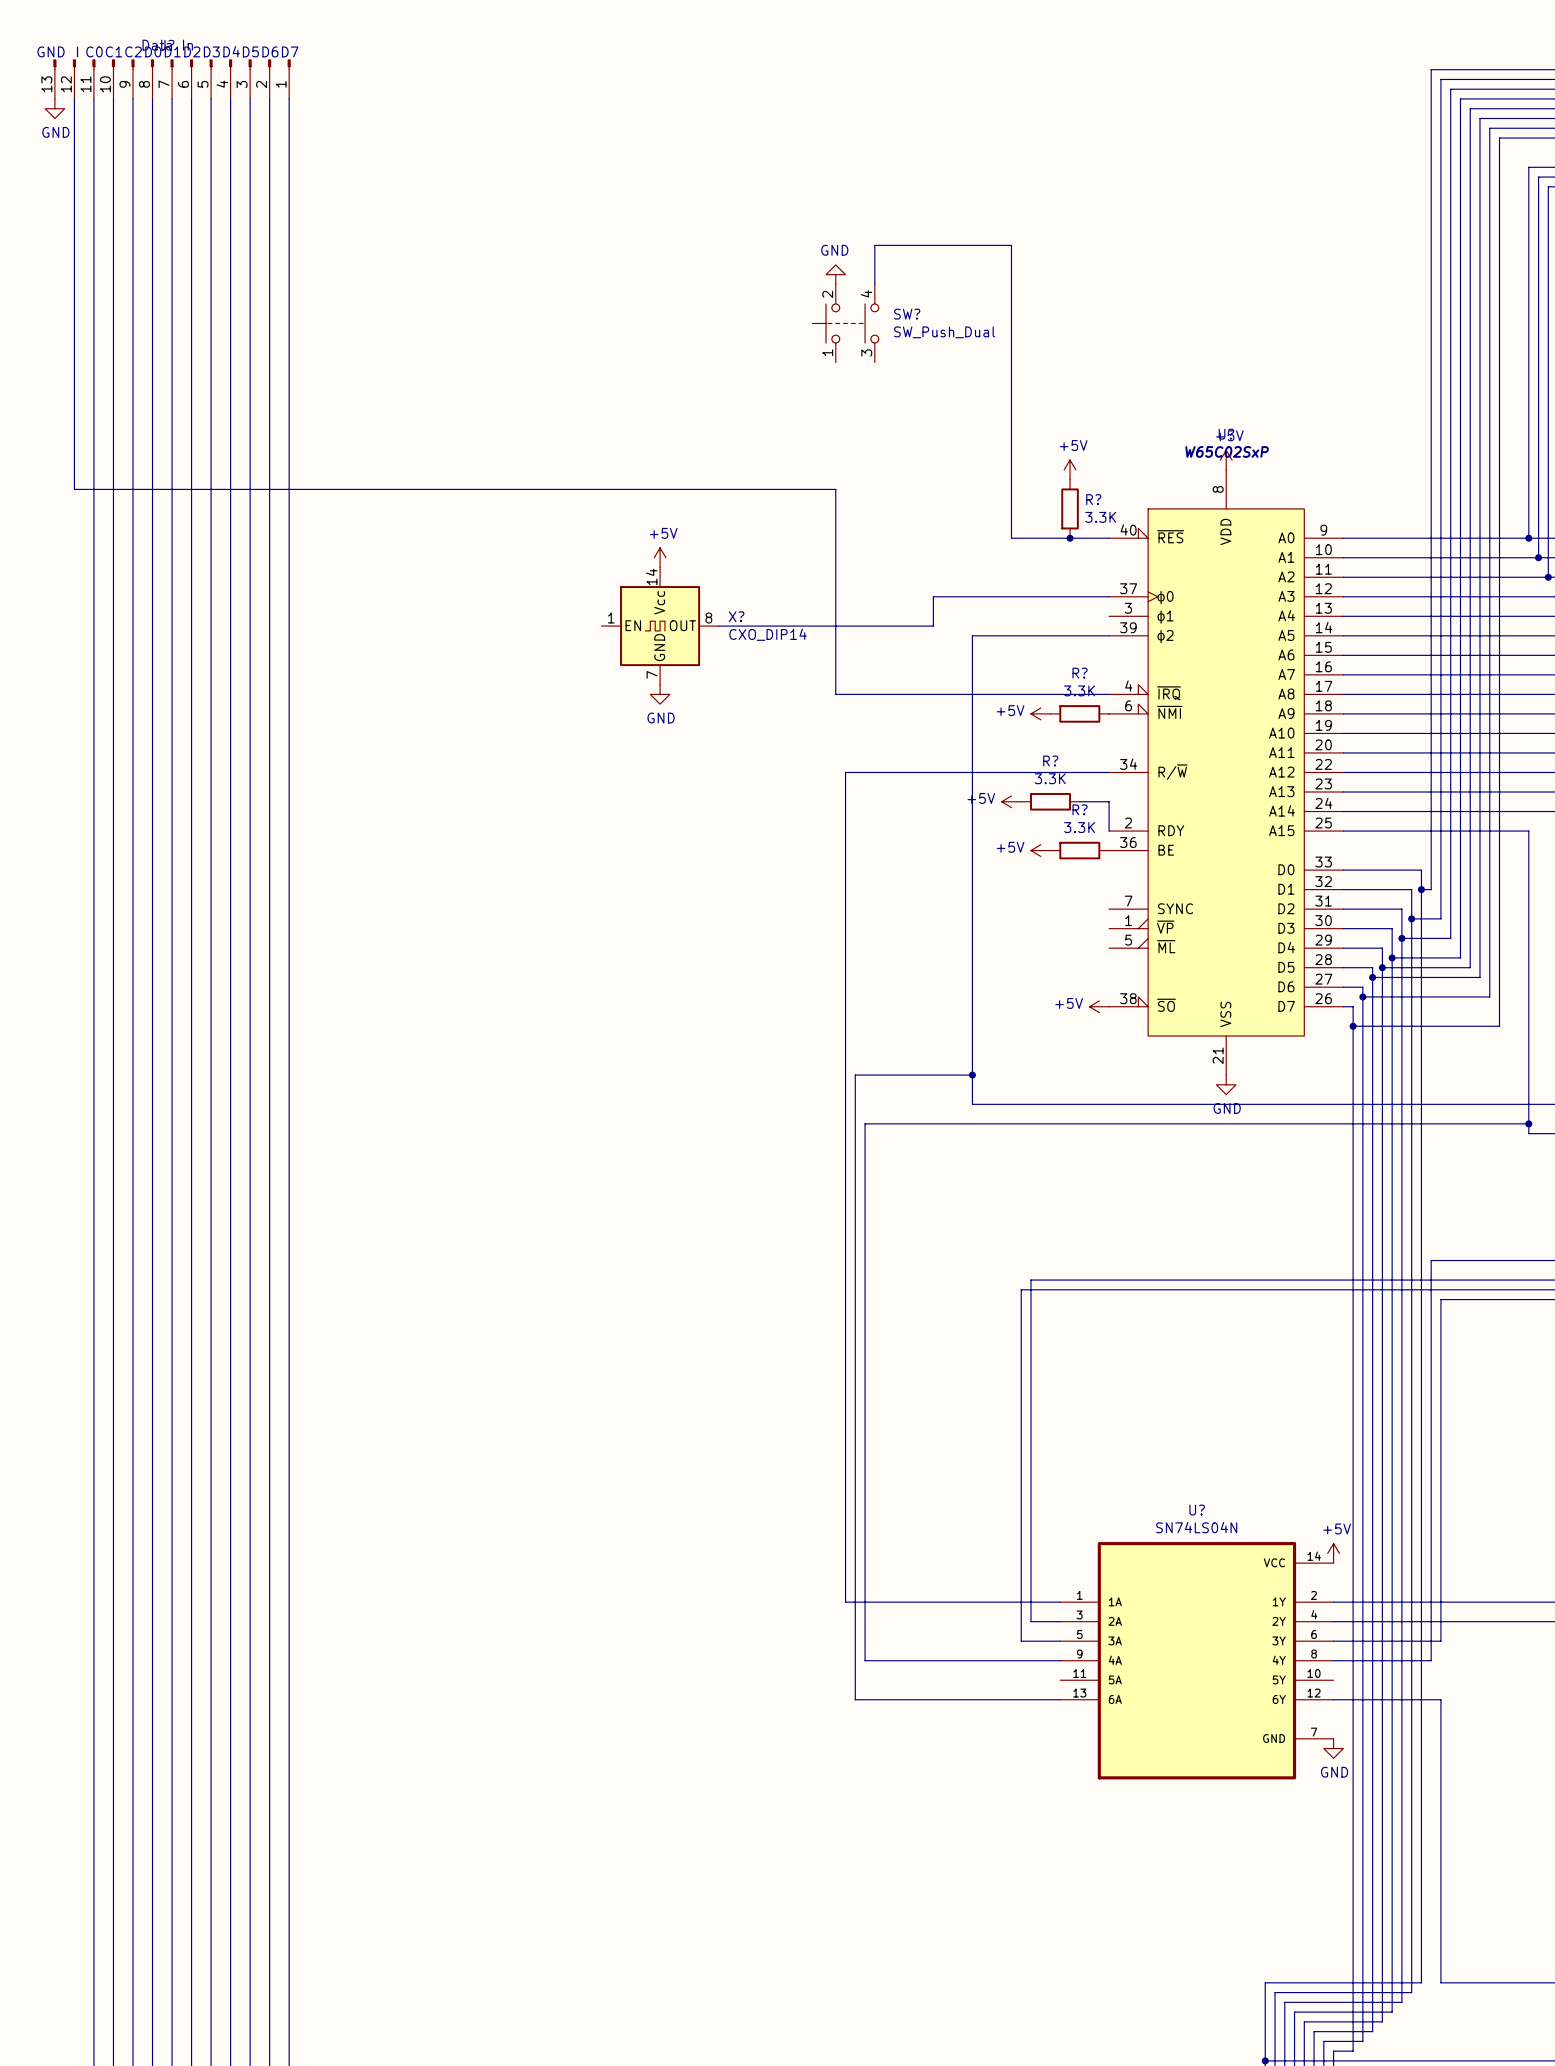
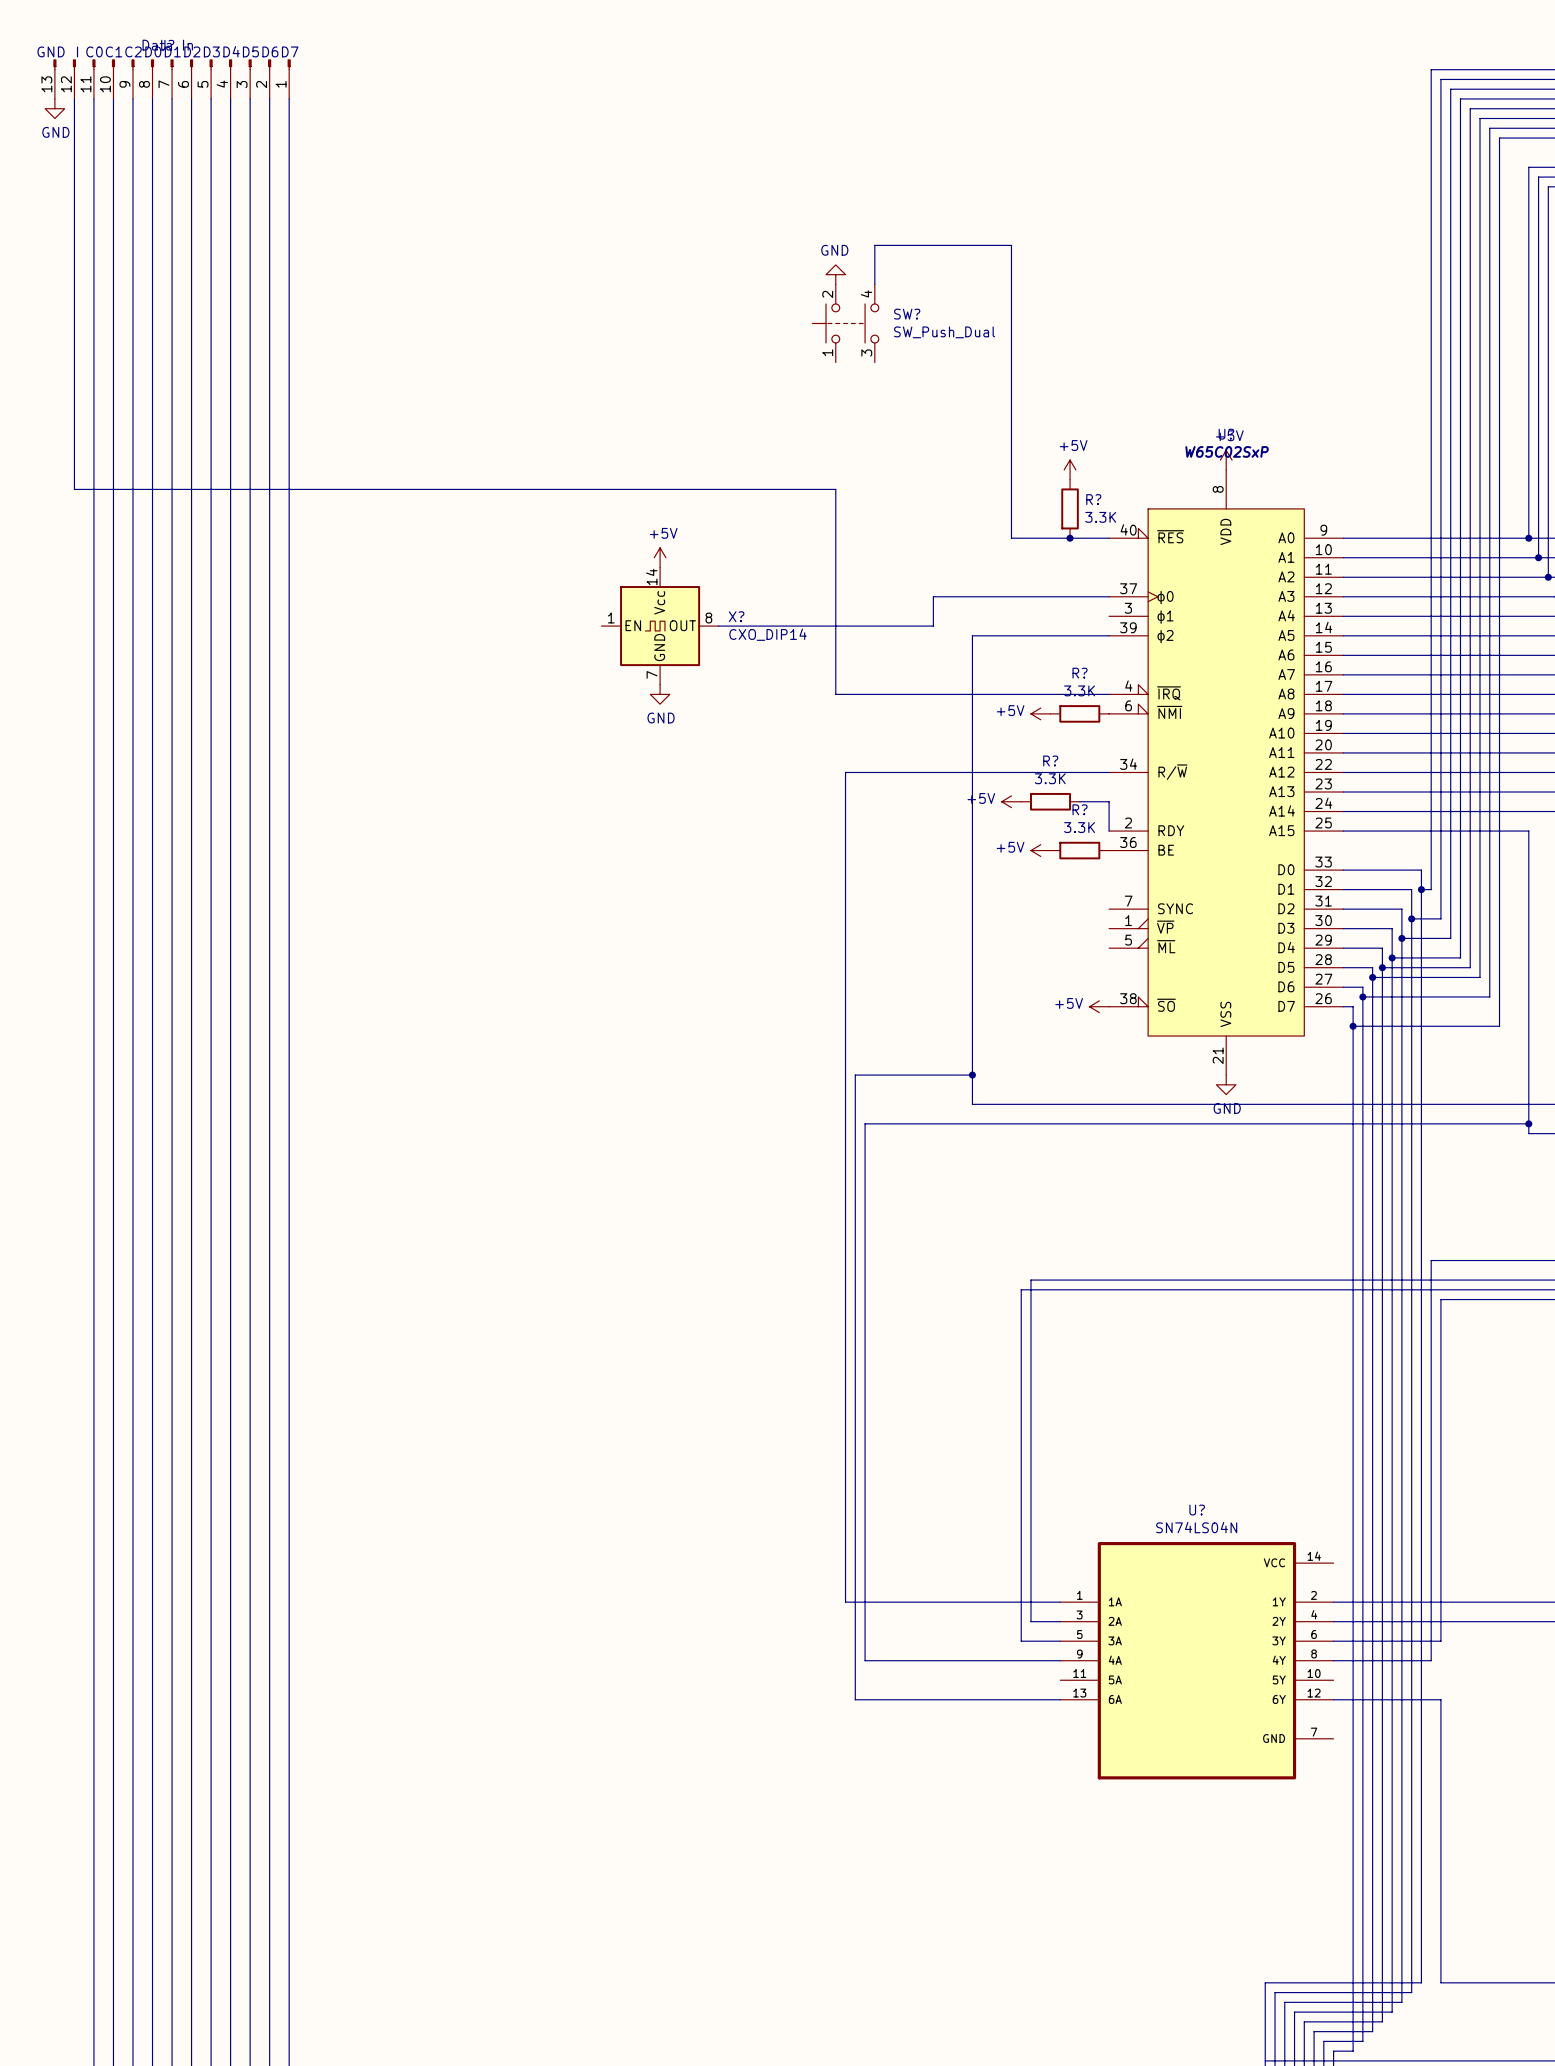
power symbol: +5V (1333, 1553) -> none
power symbol: GND (1333, 1748) -> none
junction: (1265, 2060) -> none

